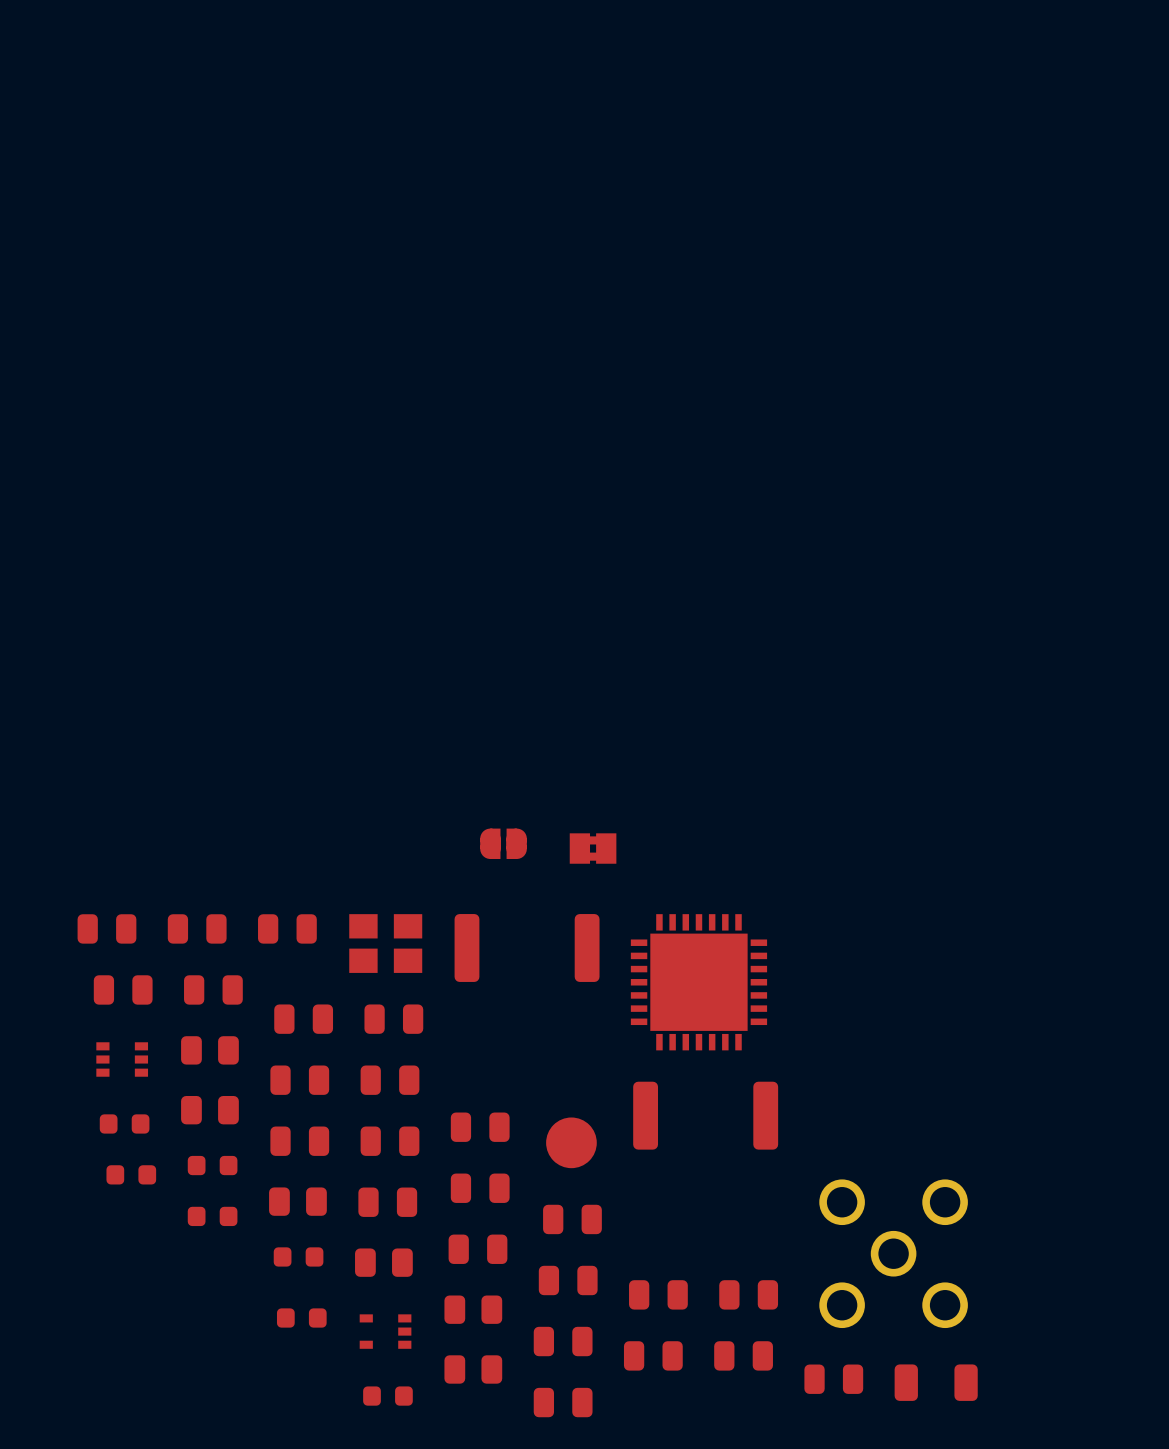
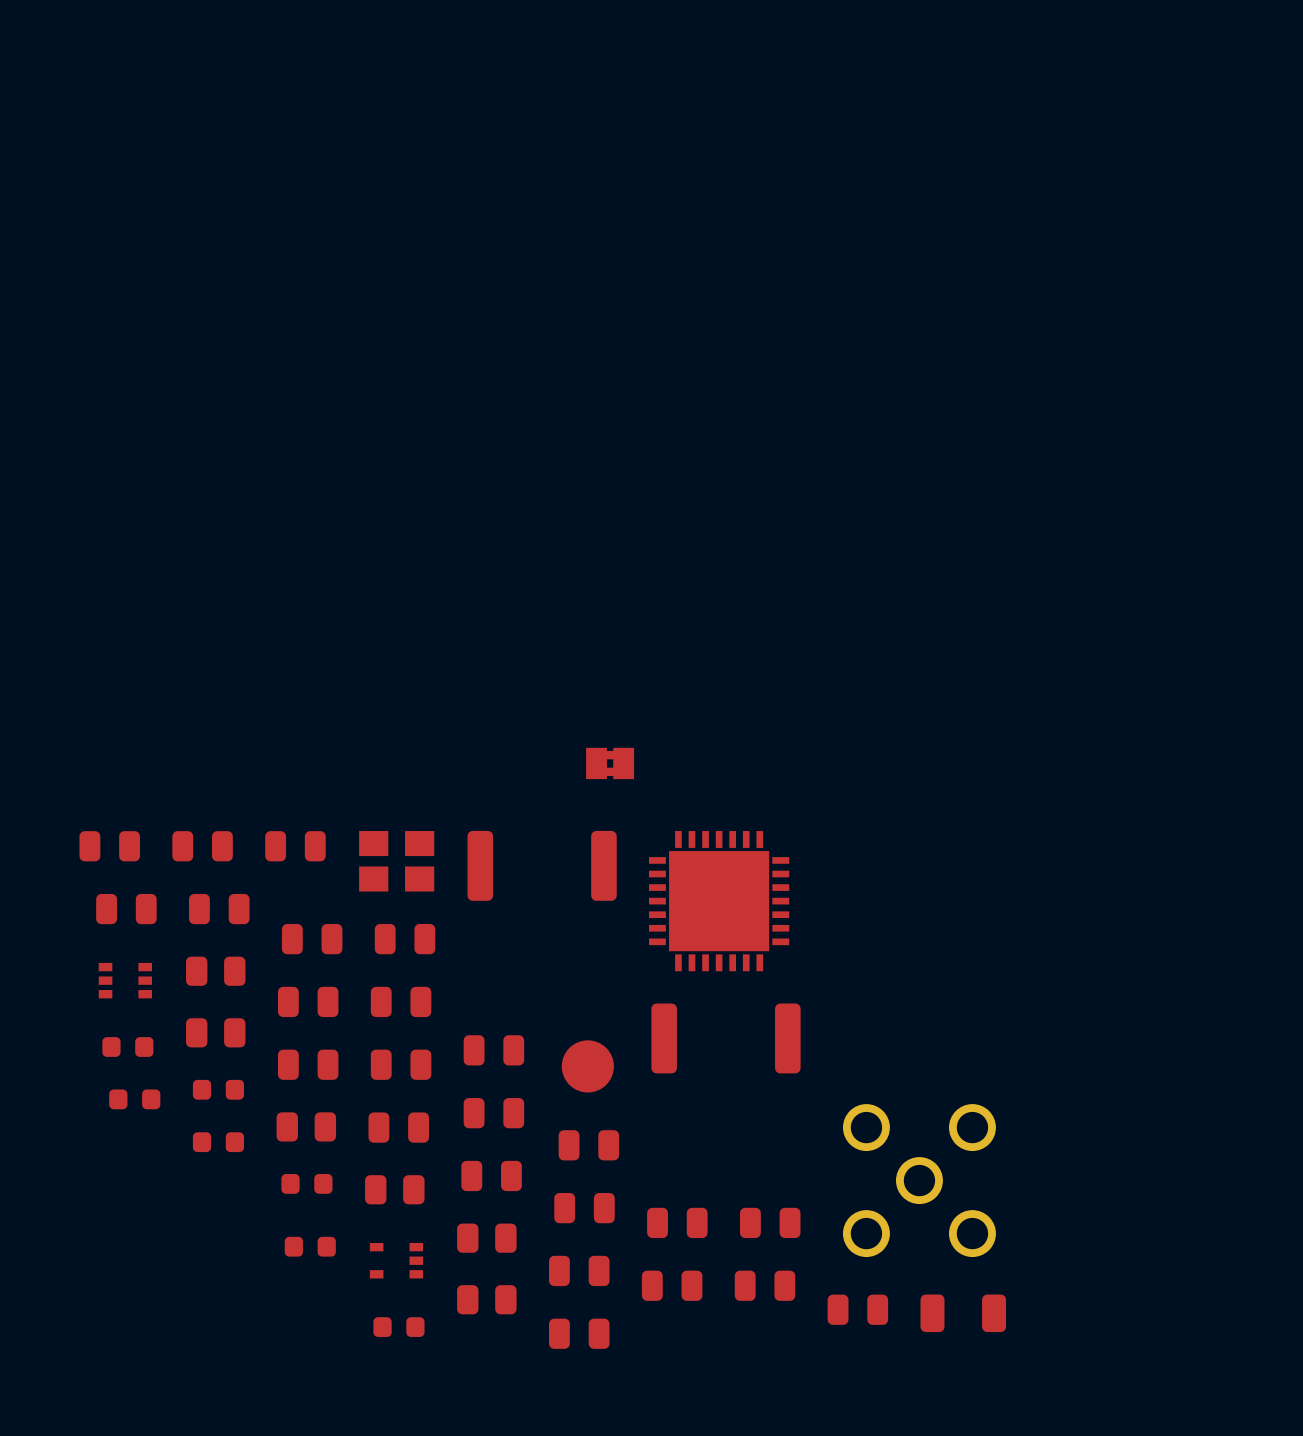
part: (503, 843) -> none

